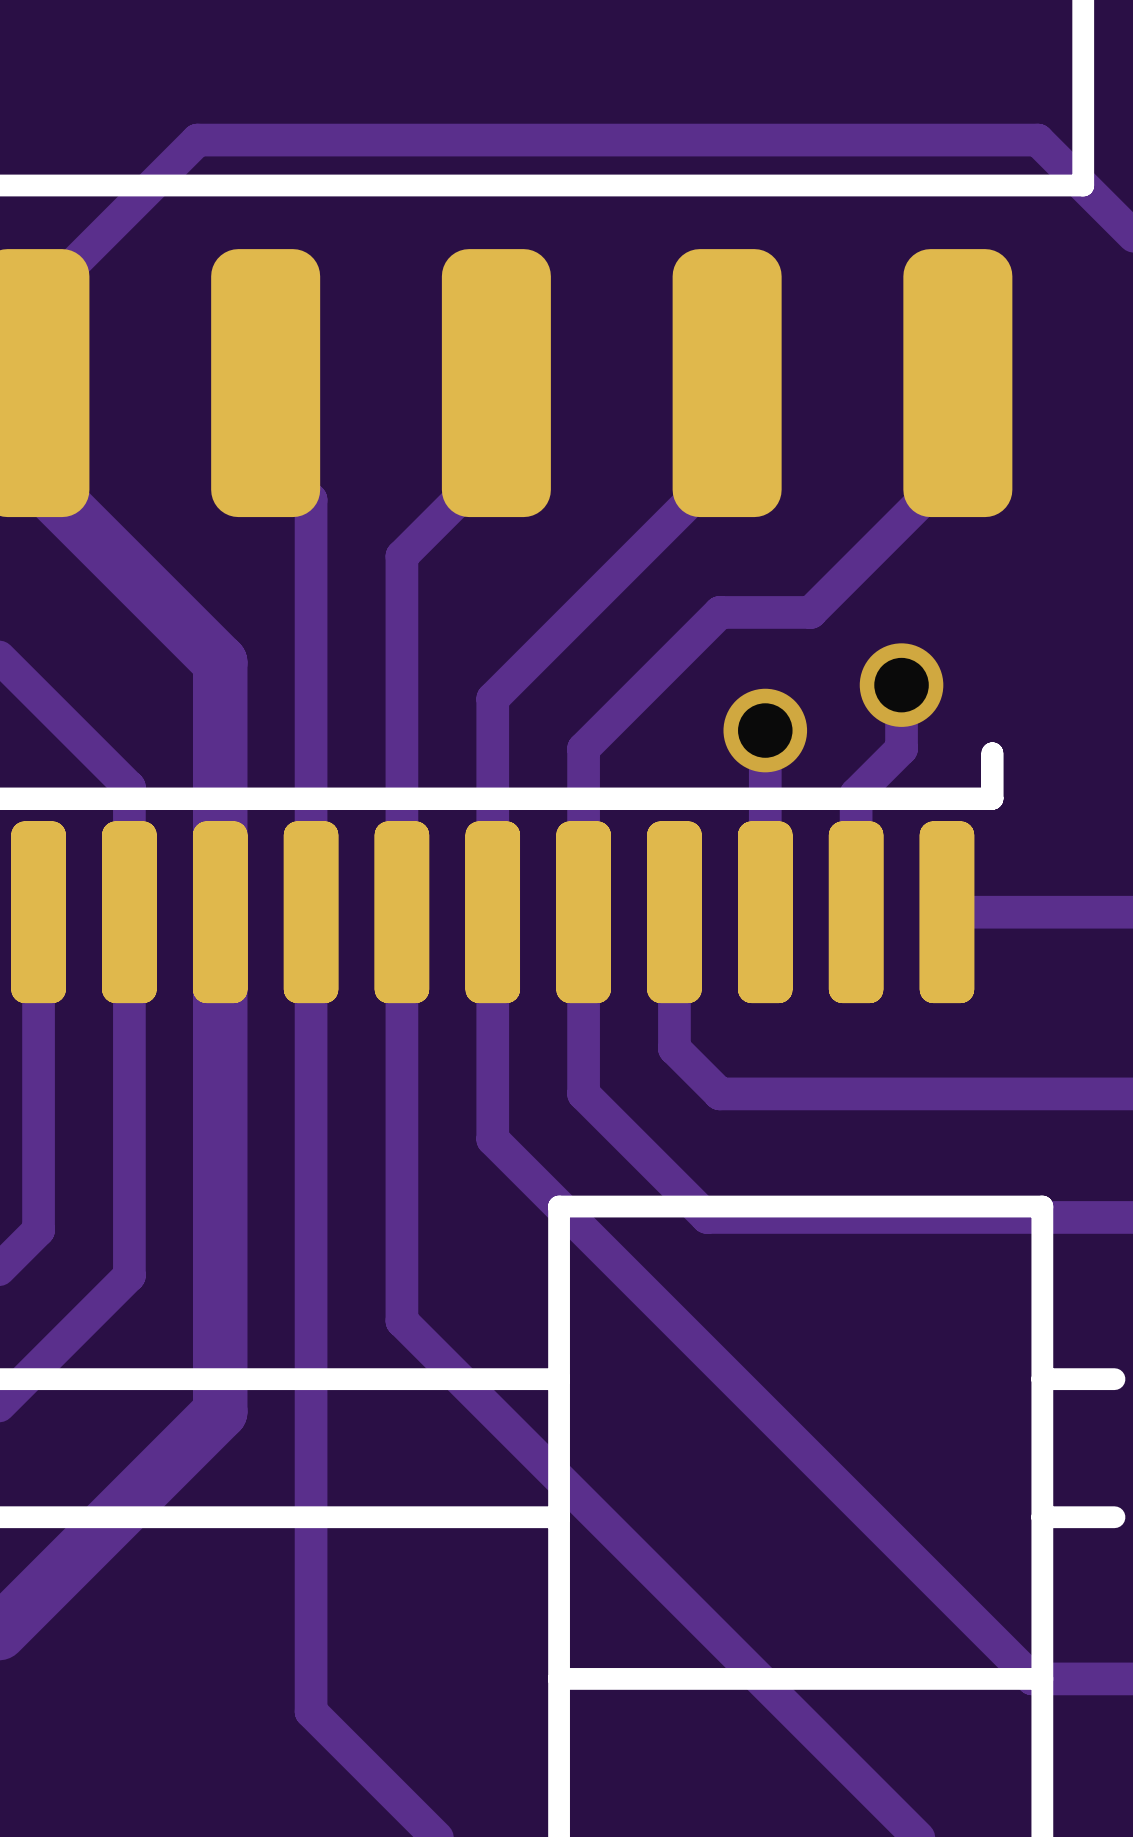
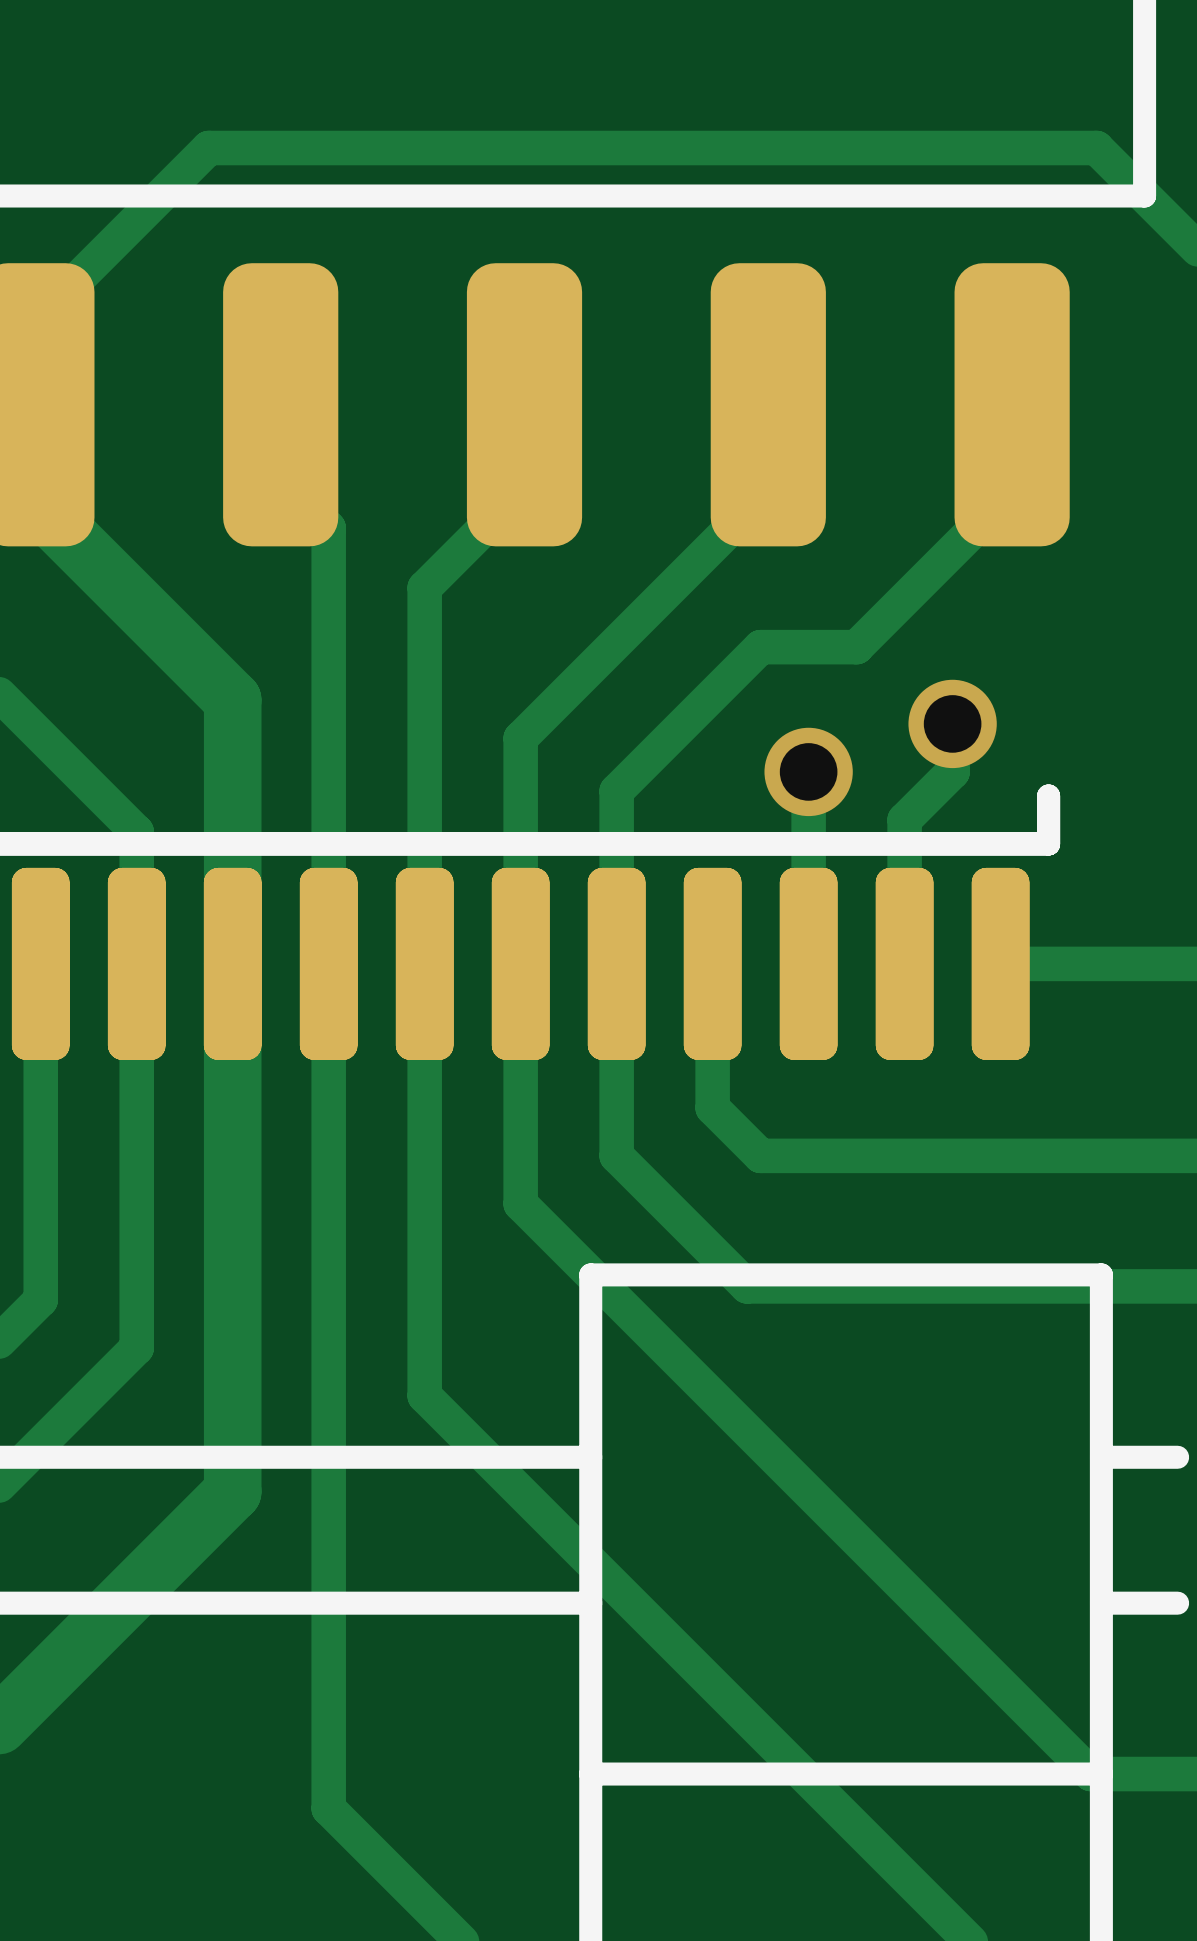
track: (901, 730) (901, 748) (856, 794) -> (952, 771) (904, 819) (904, 839)

